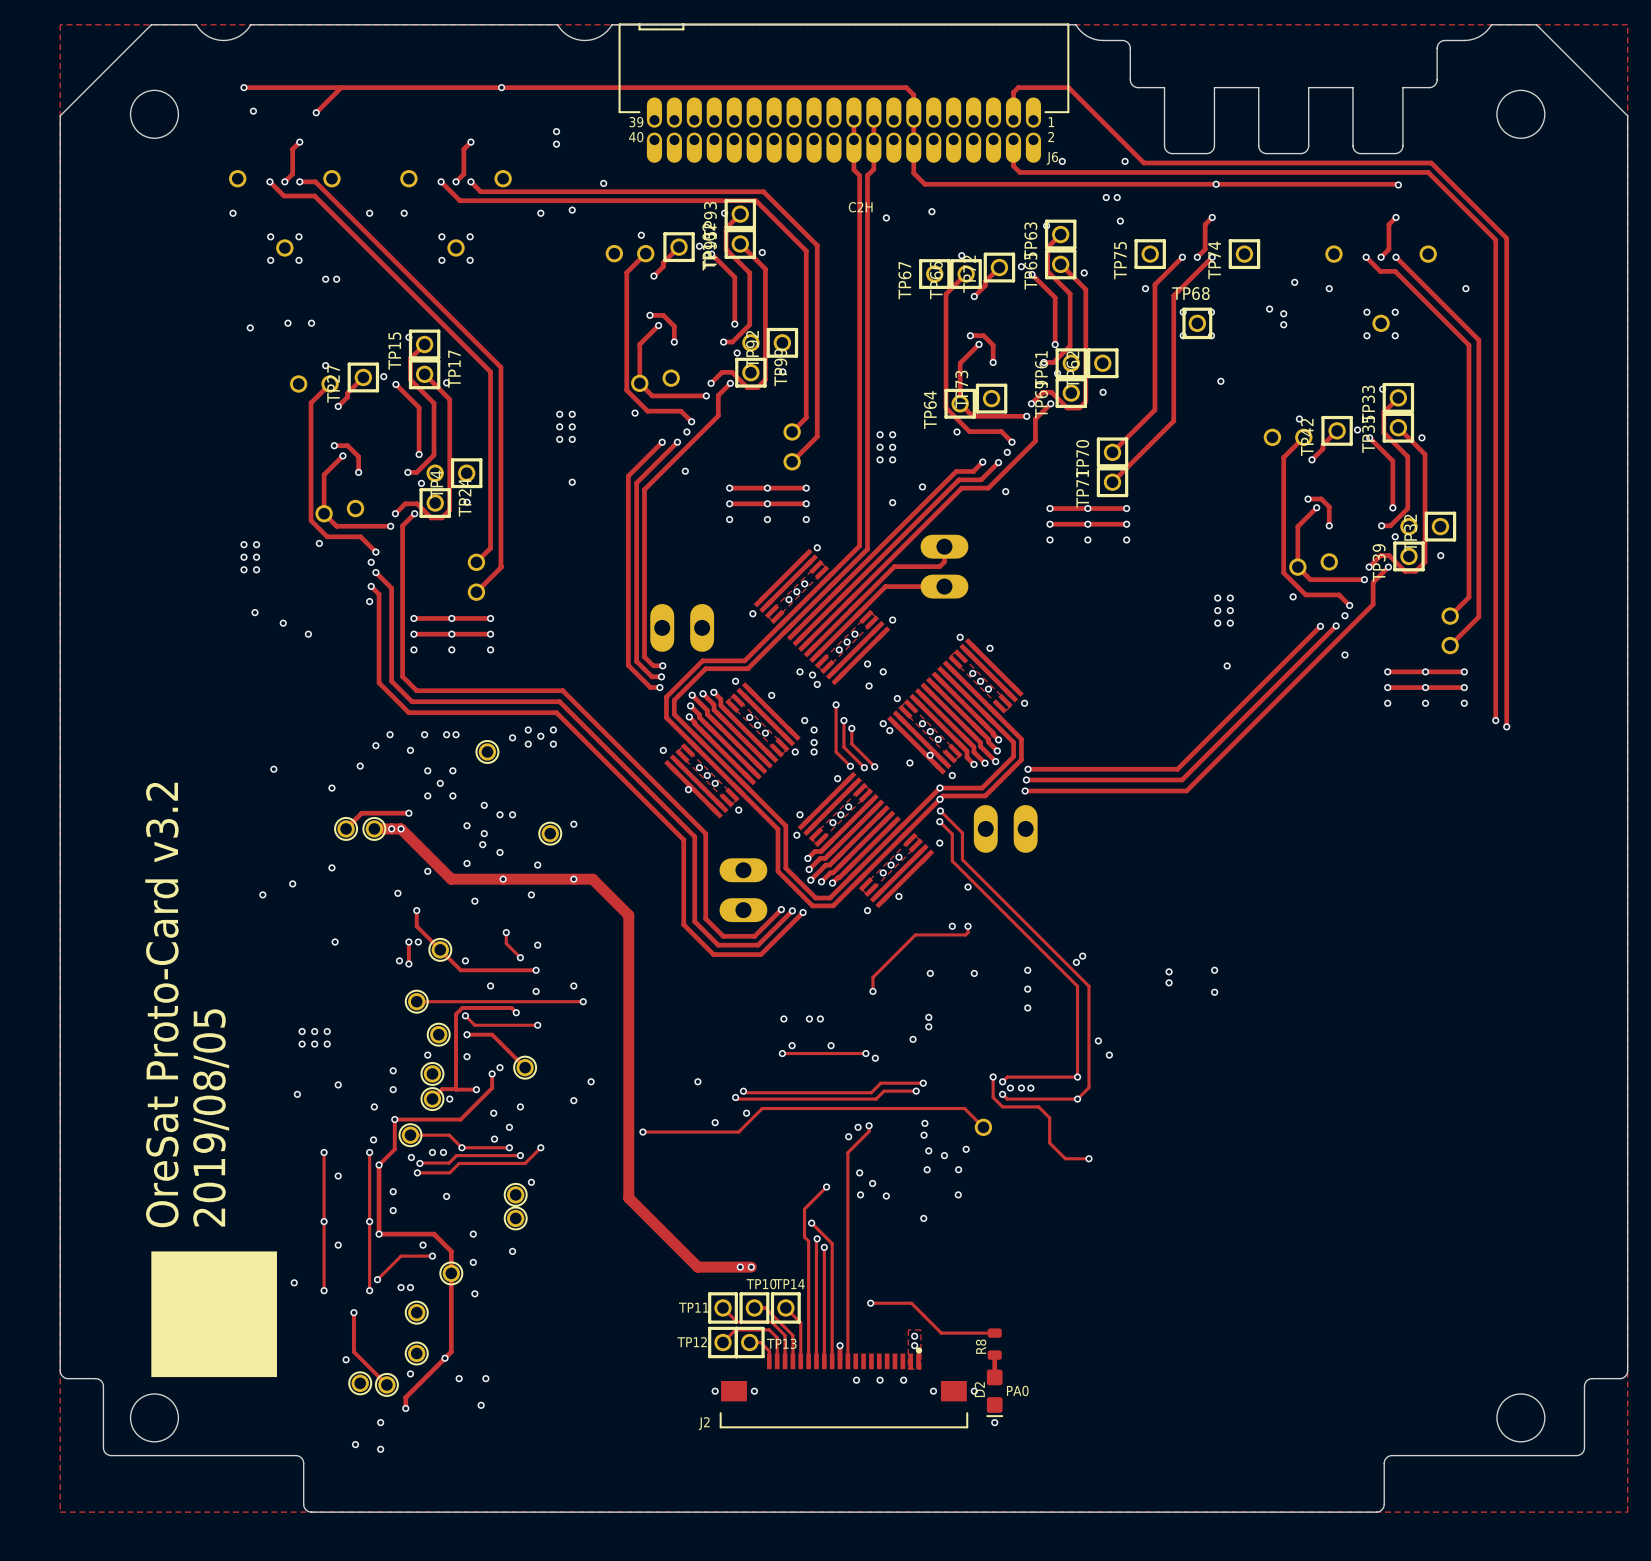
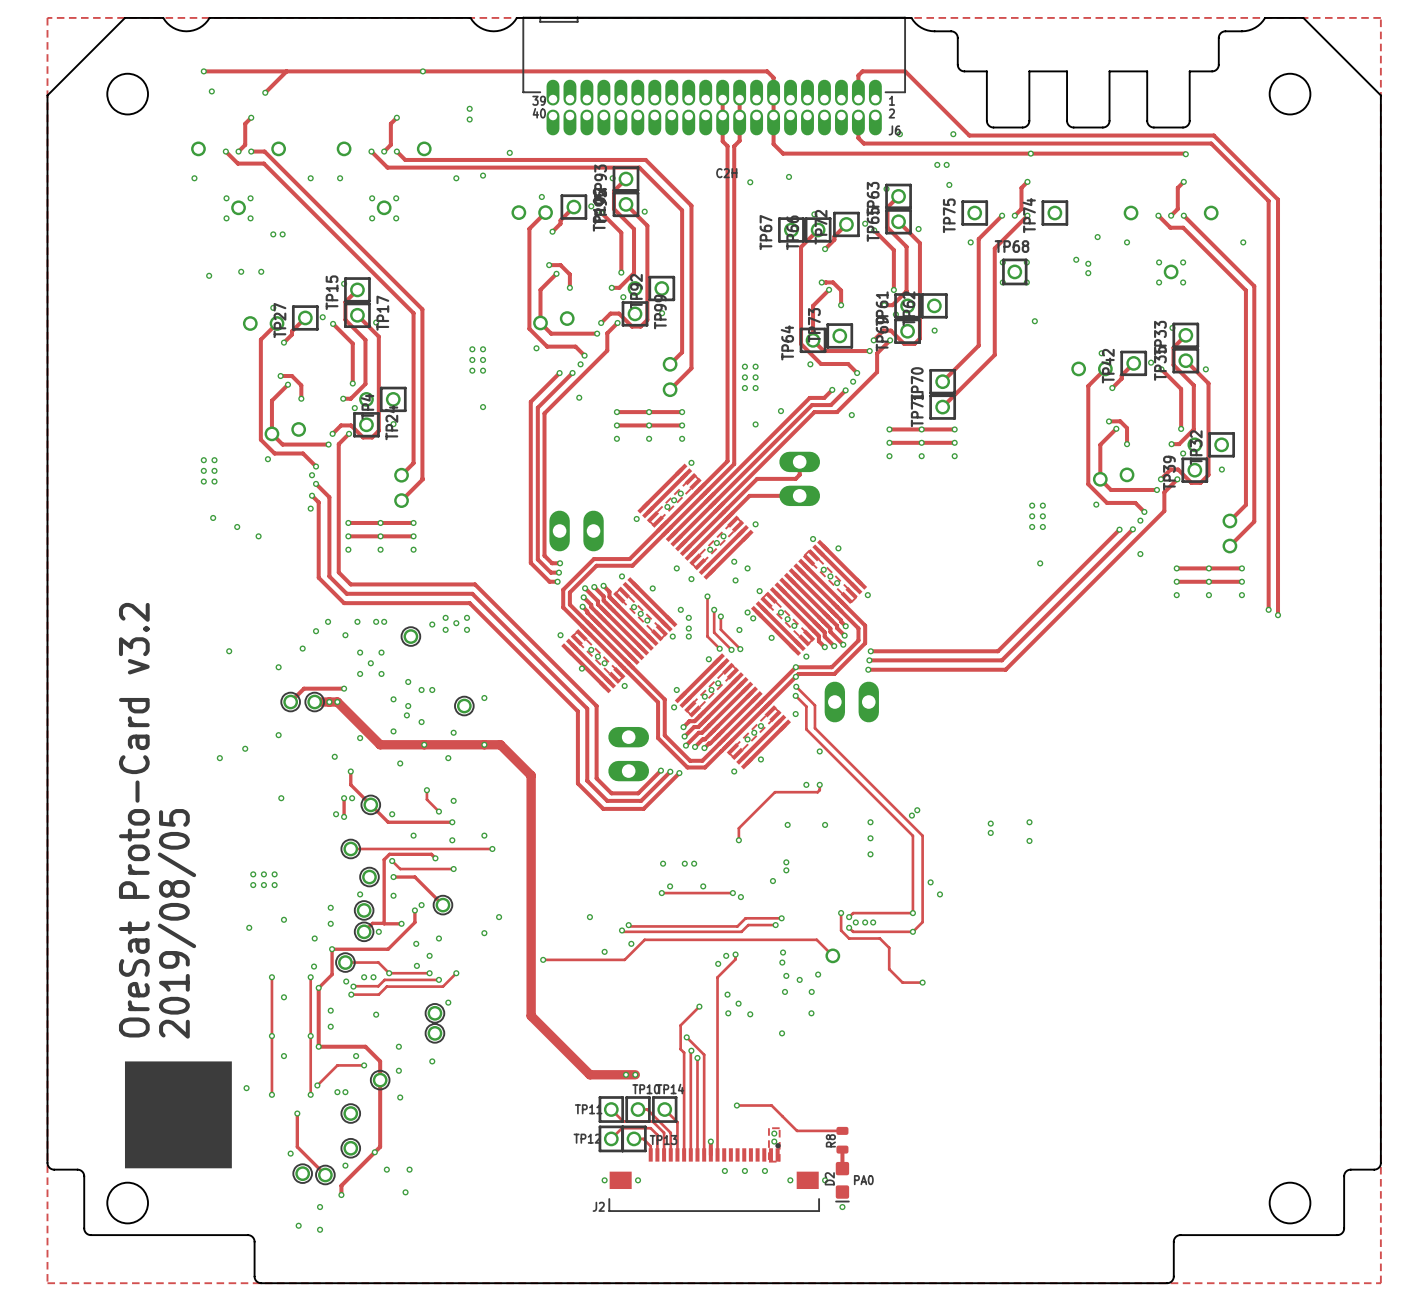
via: (812, 675) -> none
via: none -> (739, 630)
via: none -> (771, 637)
via: (930, 755) -> none
via: (909, 762) -> none

